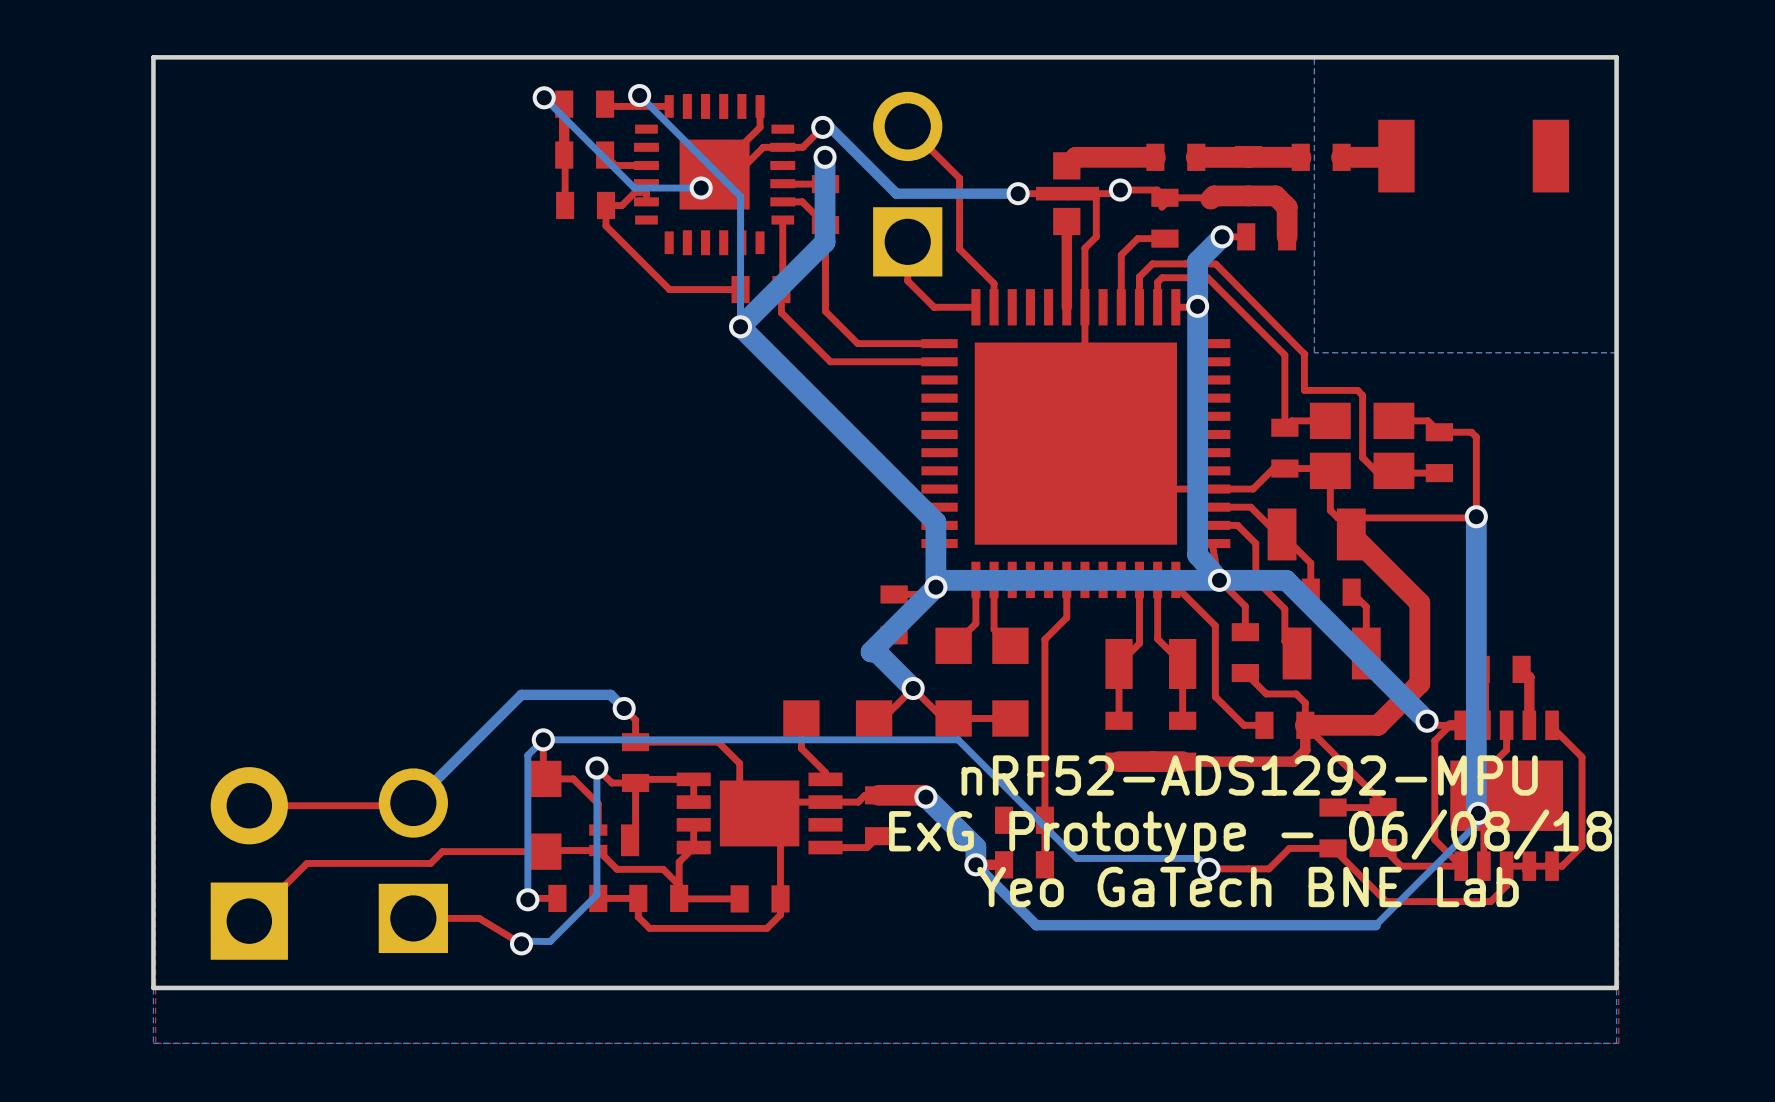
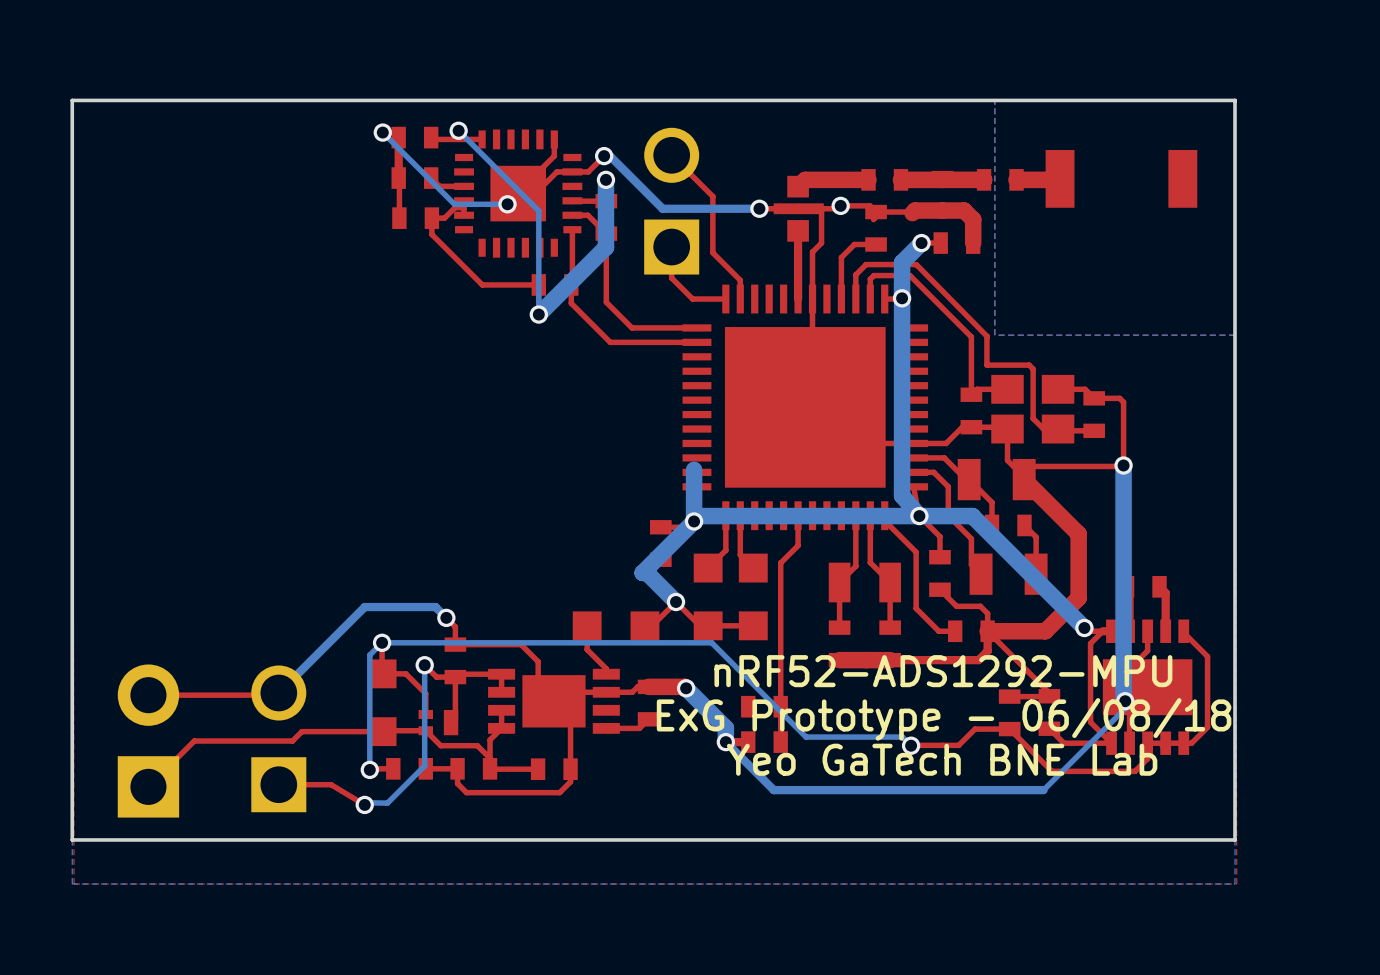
bottom track: (740, 326) (935, 522) -> none

